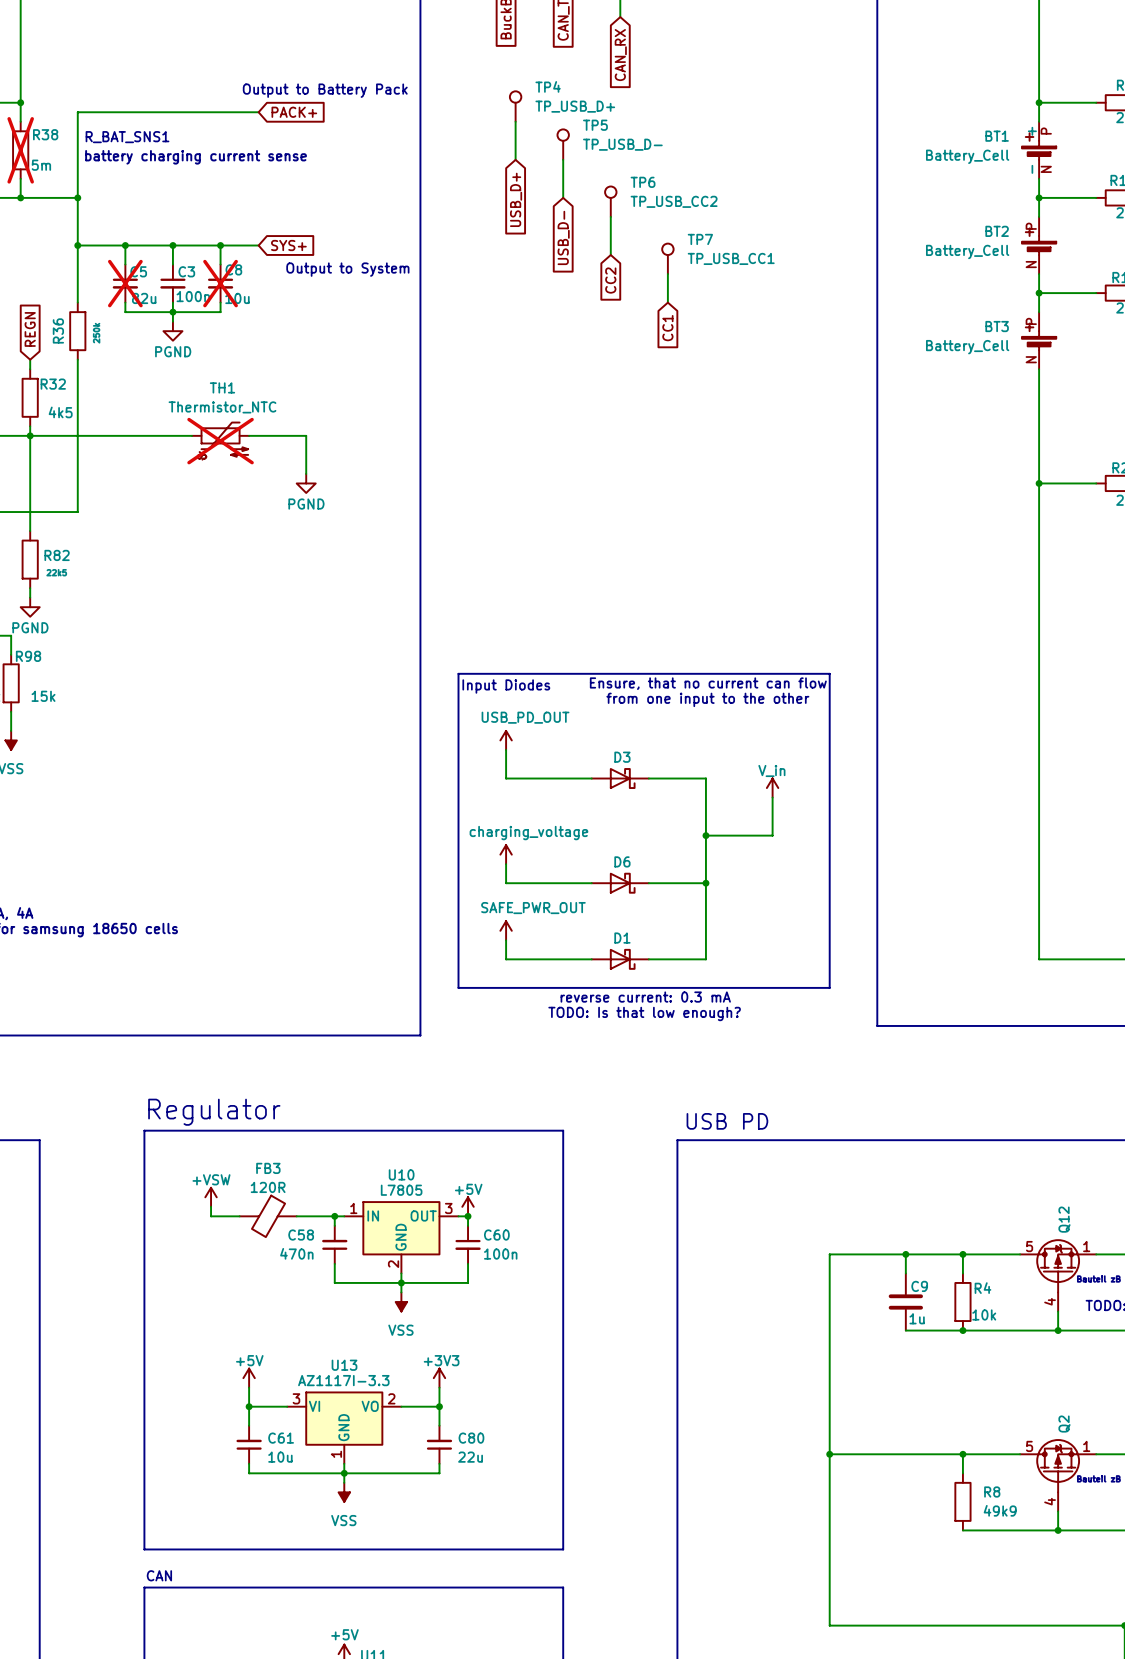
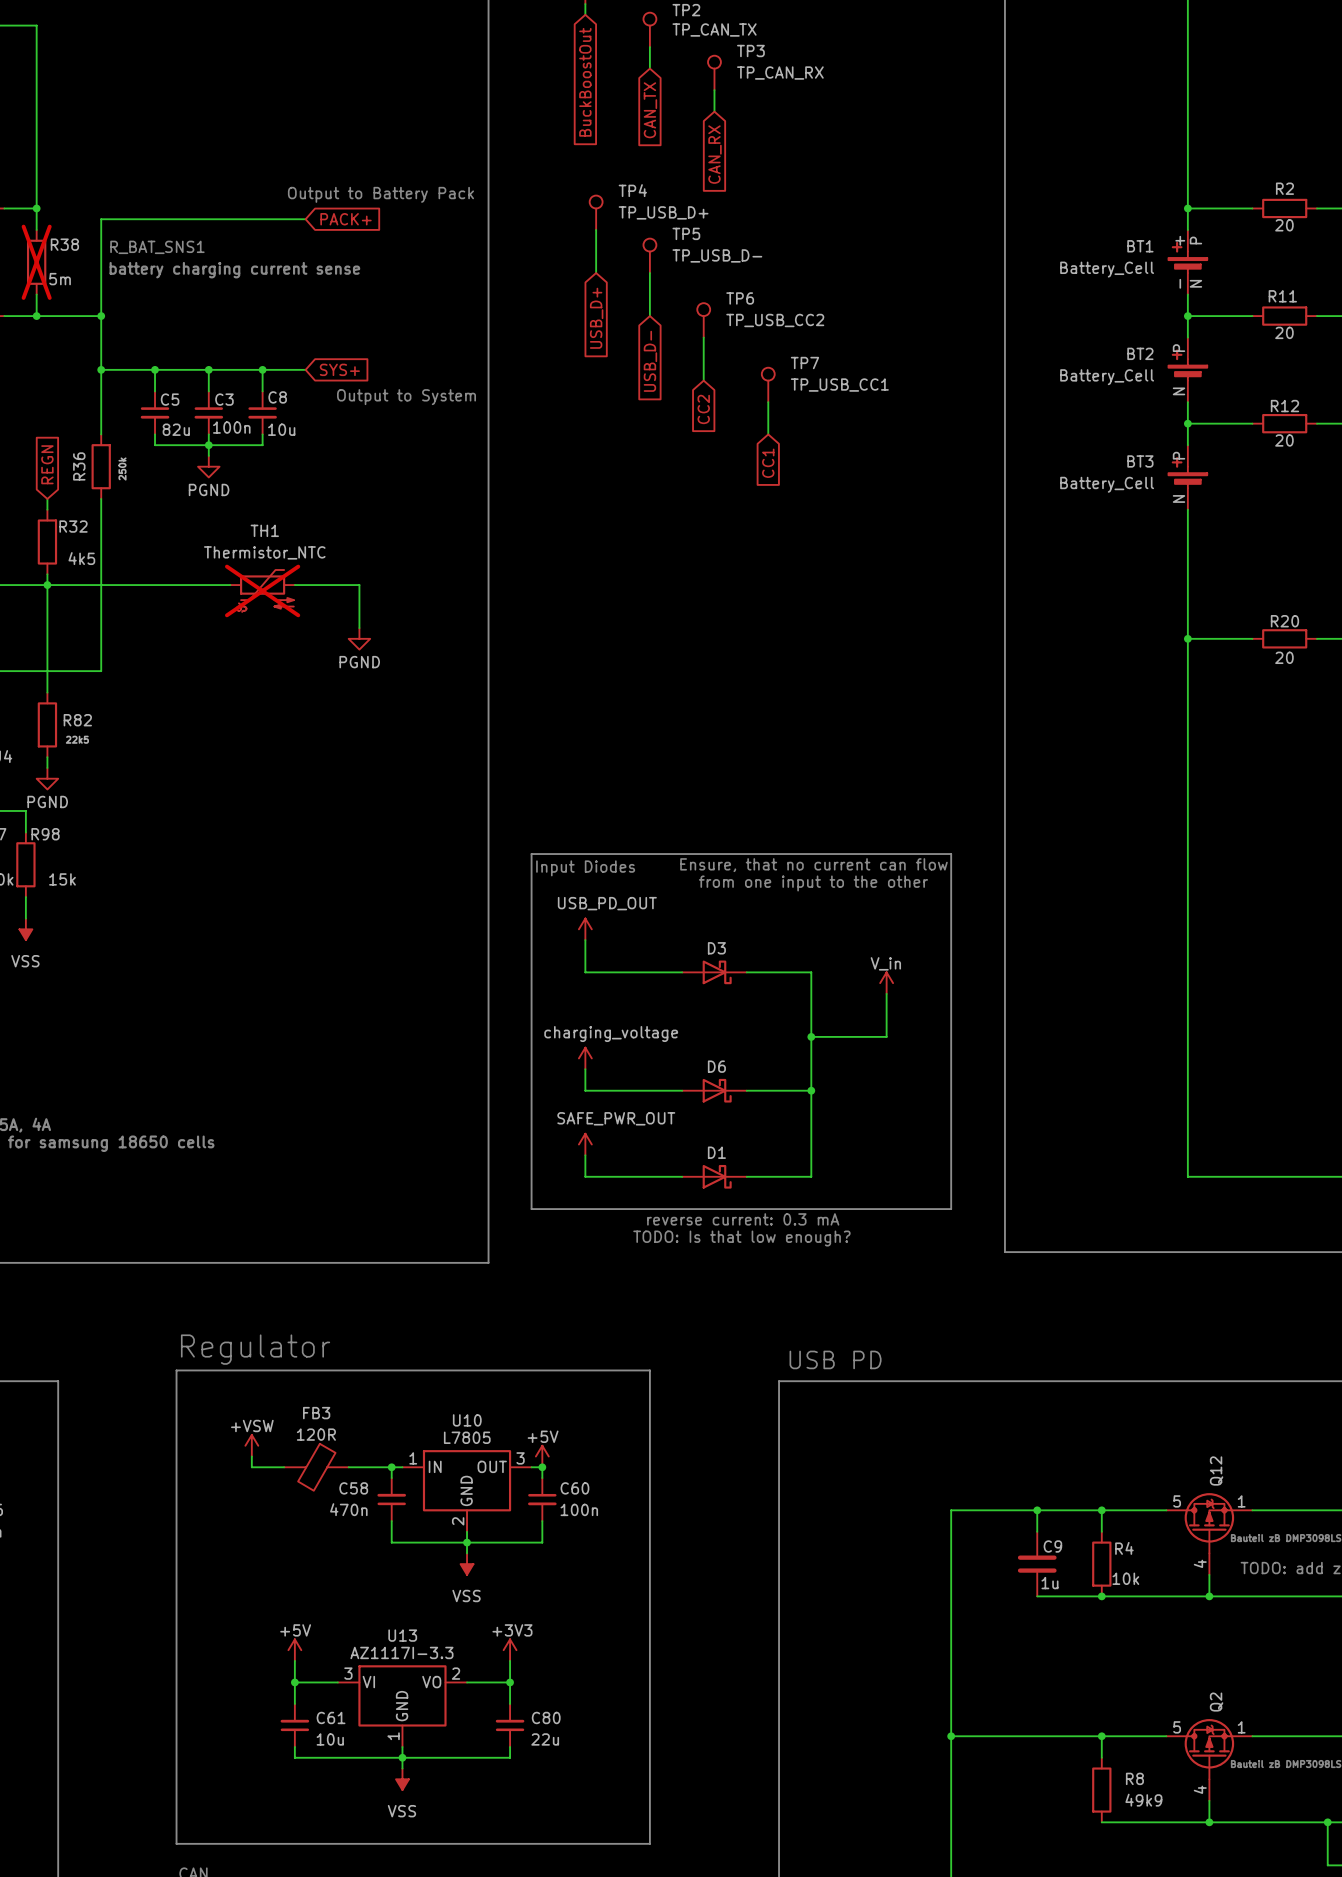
C5 do-not-place cross: (125, 283) -> none
C8 do-not-place cross: (220, 283) -> none

